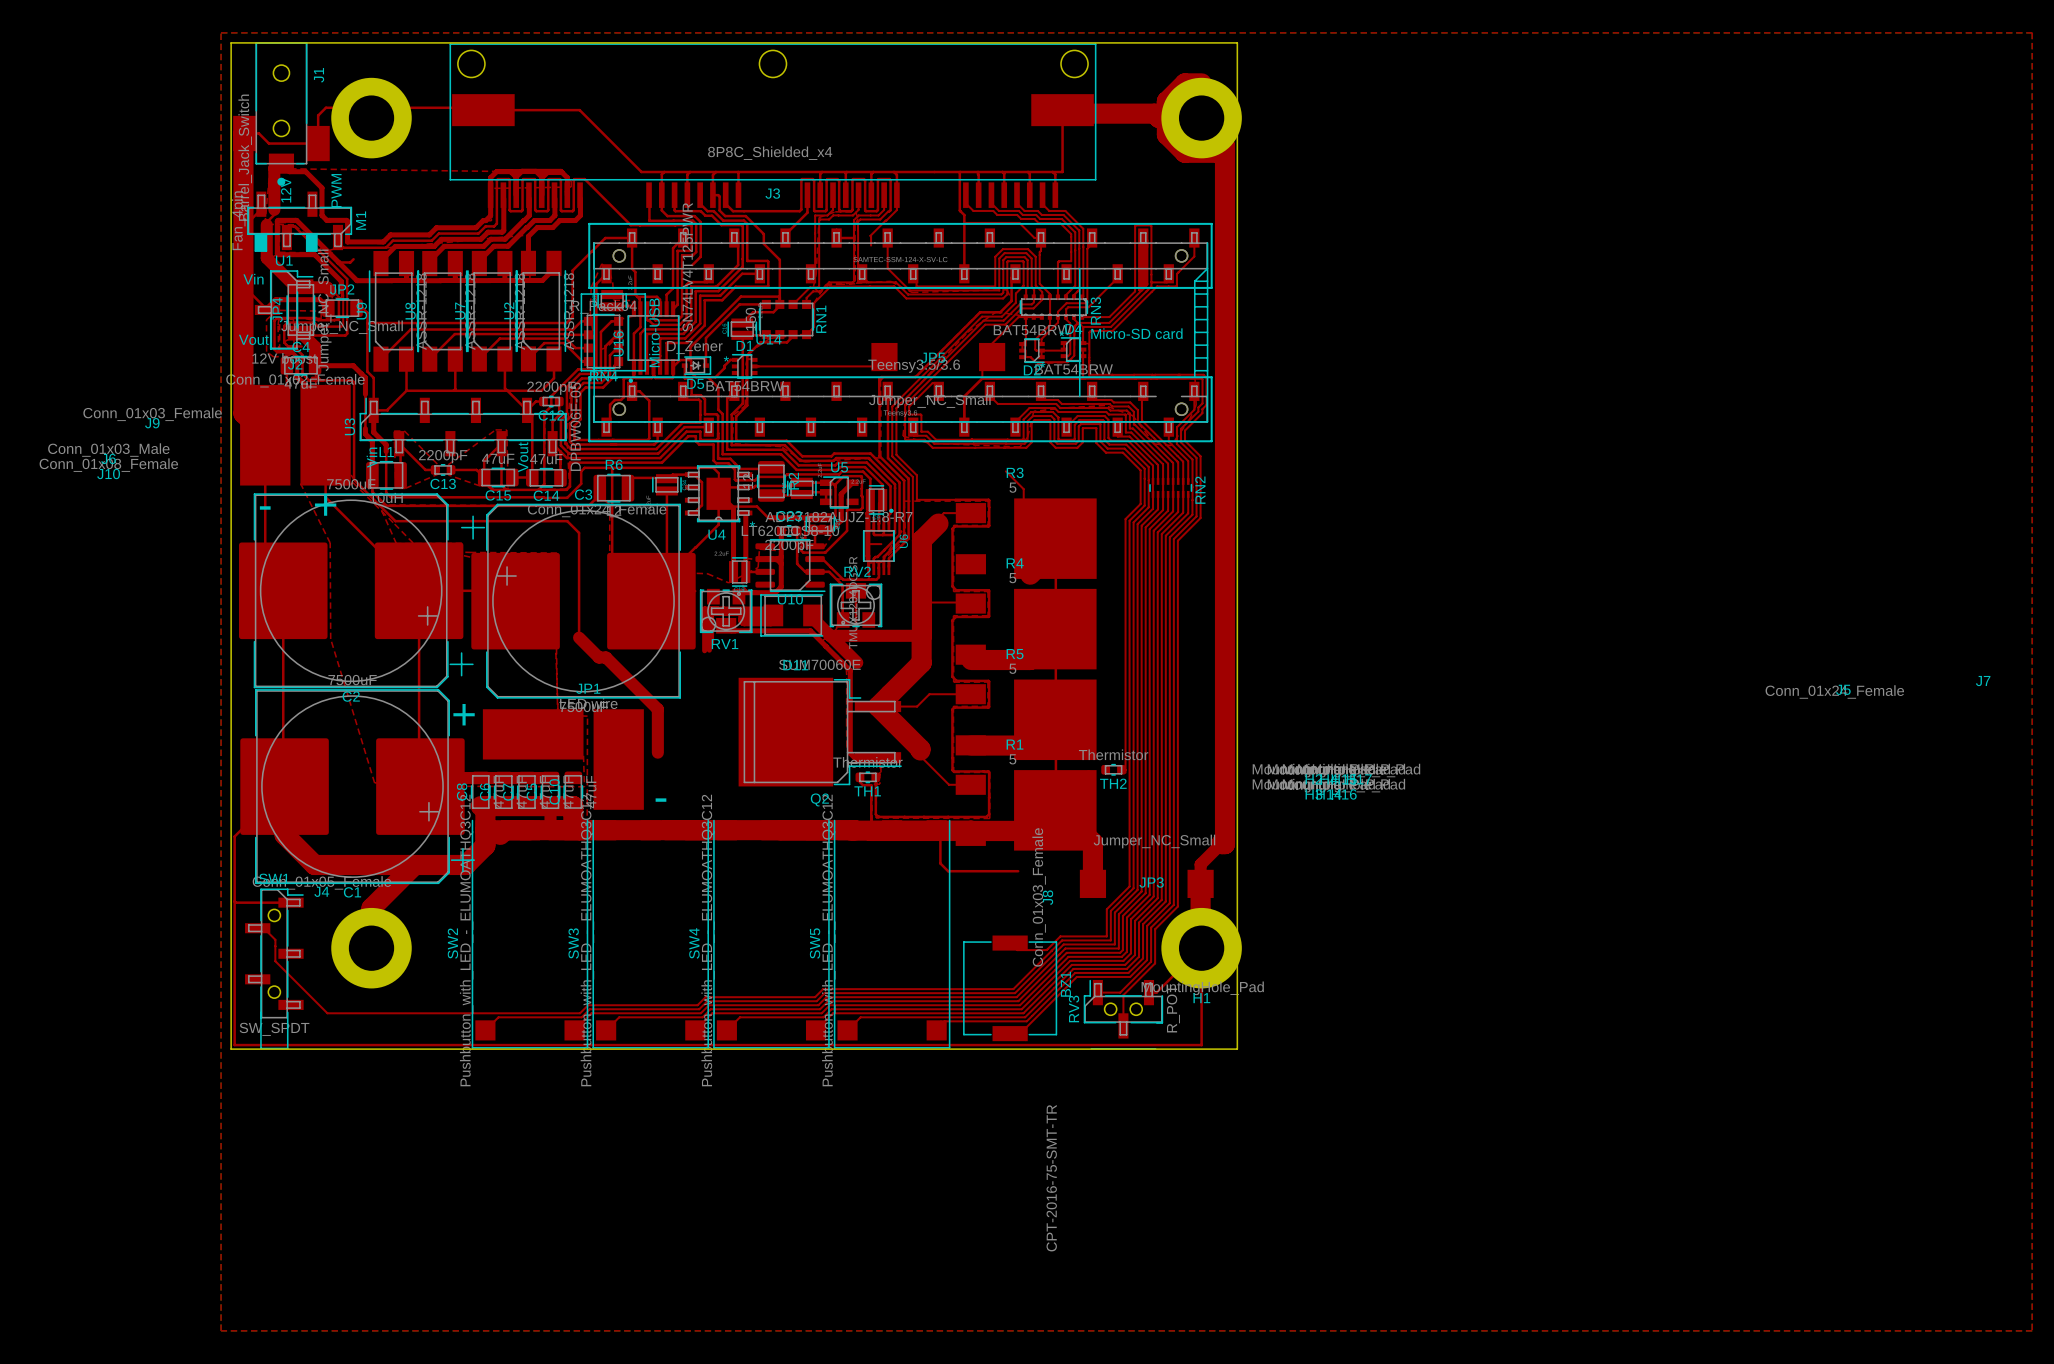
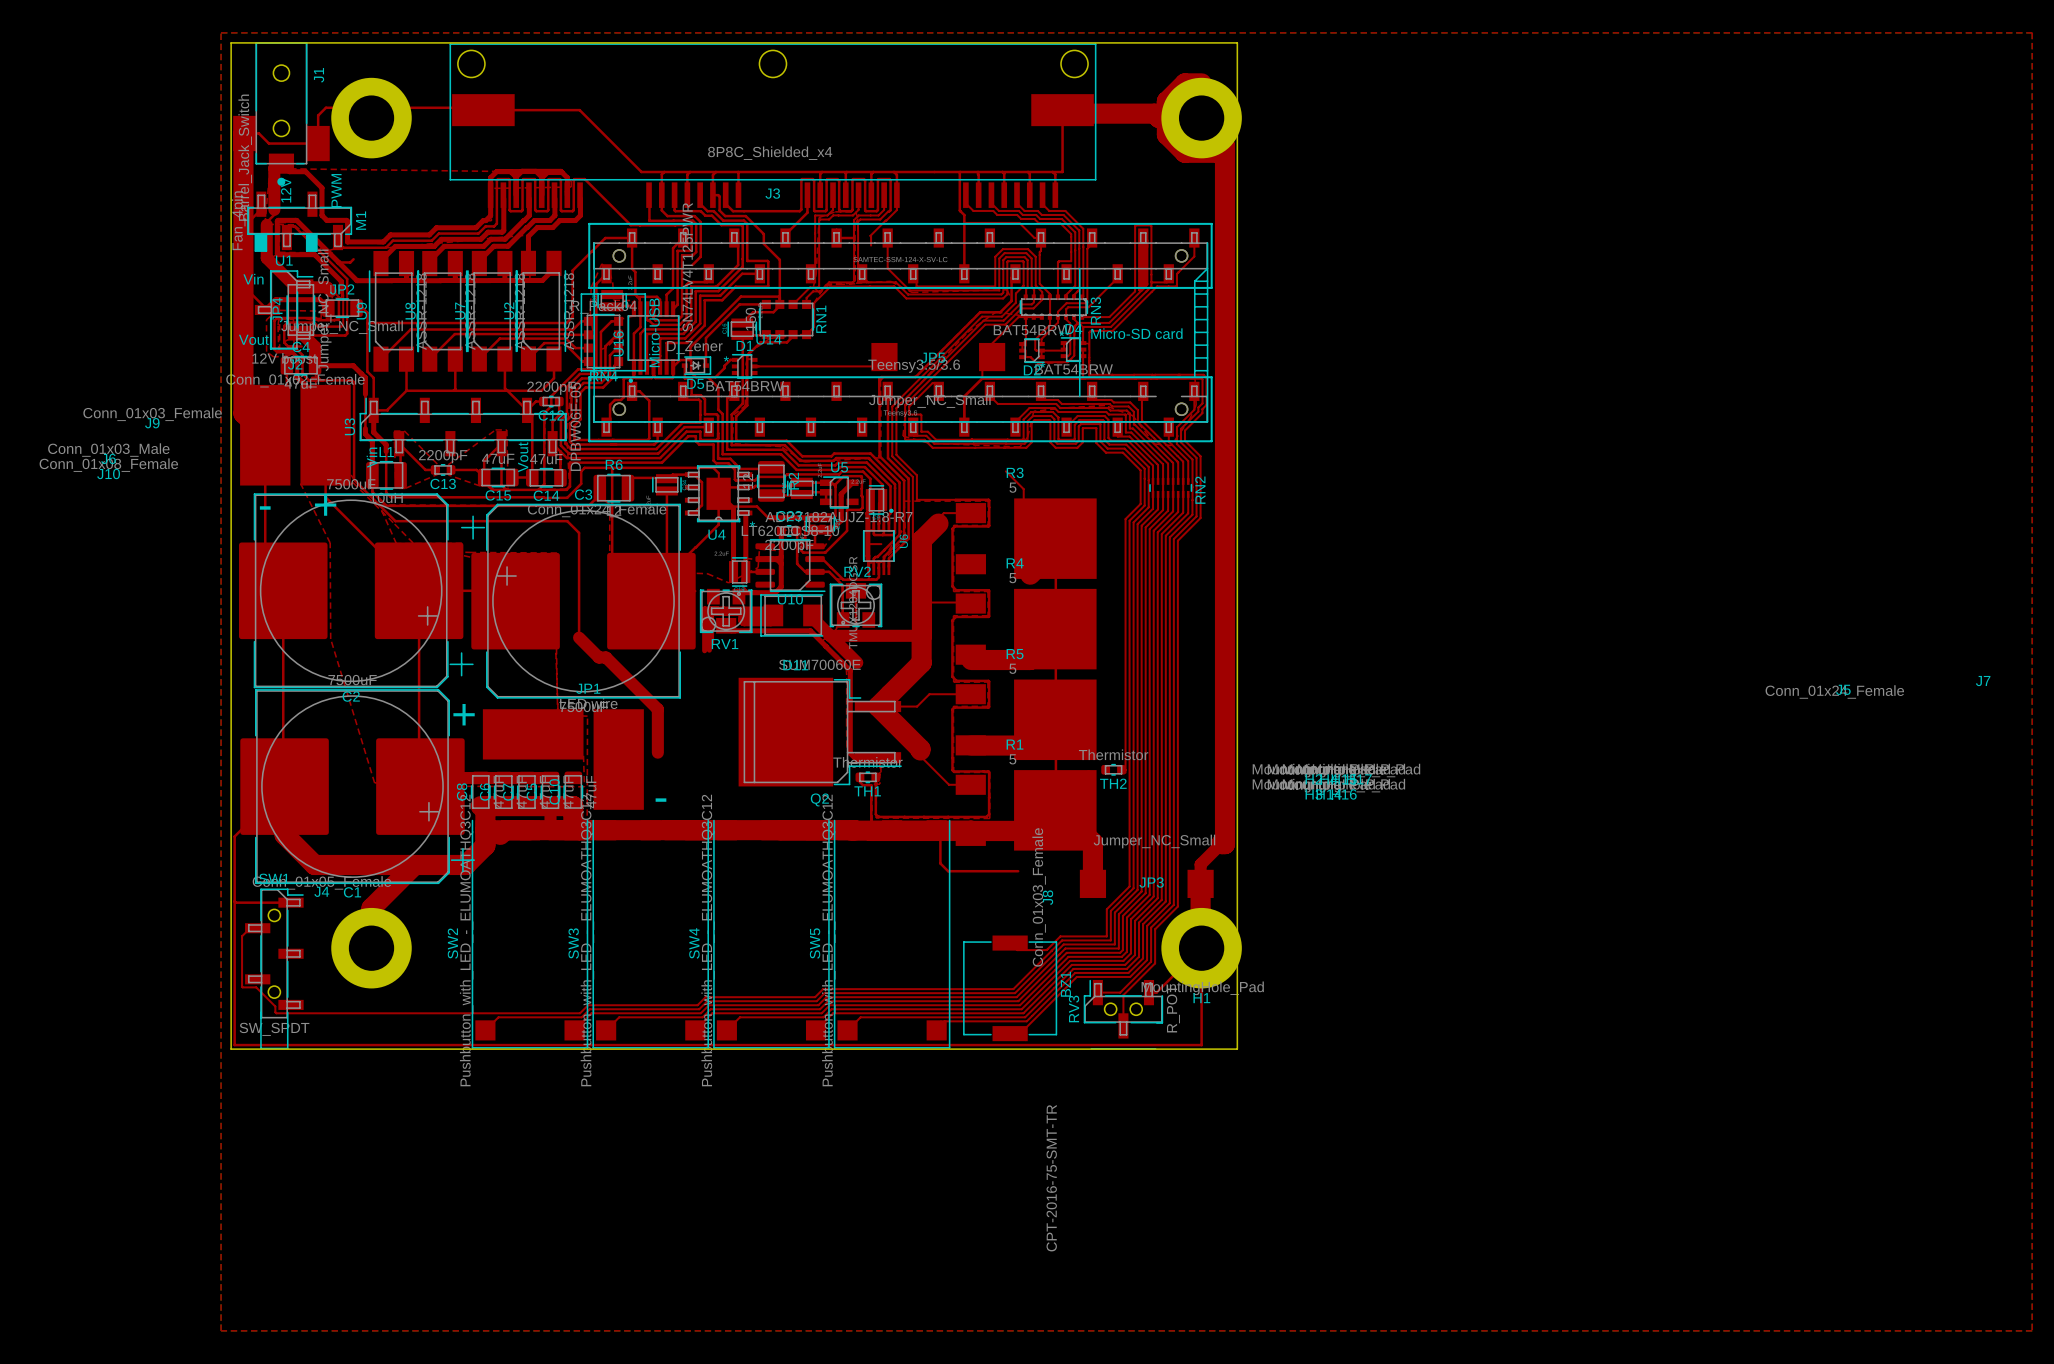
top track: (257, 928) (263, 928) (275, 939) (275, 961) (327, 1013) -> (257, 928) (250, 928) (242, 936) (242, 986) (256, 987) (275, 1006) (276, 1013) (327, 1013)

